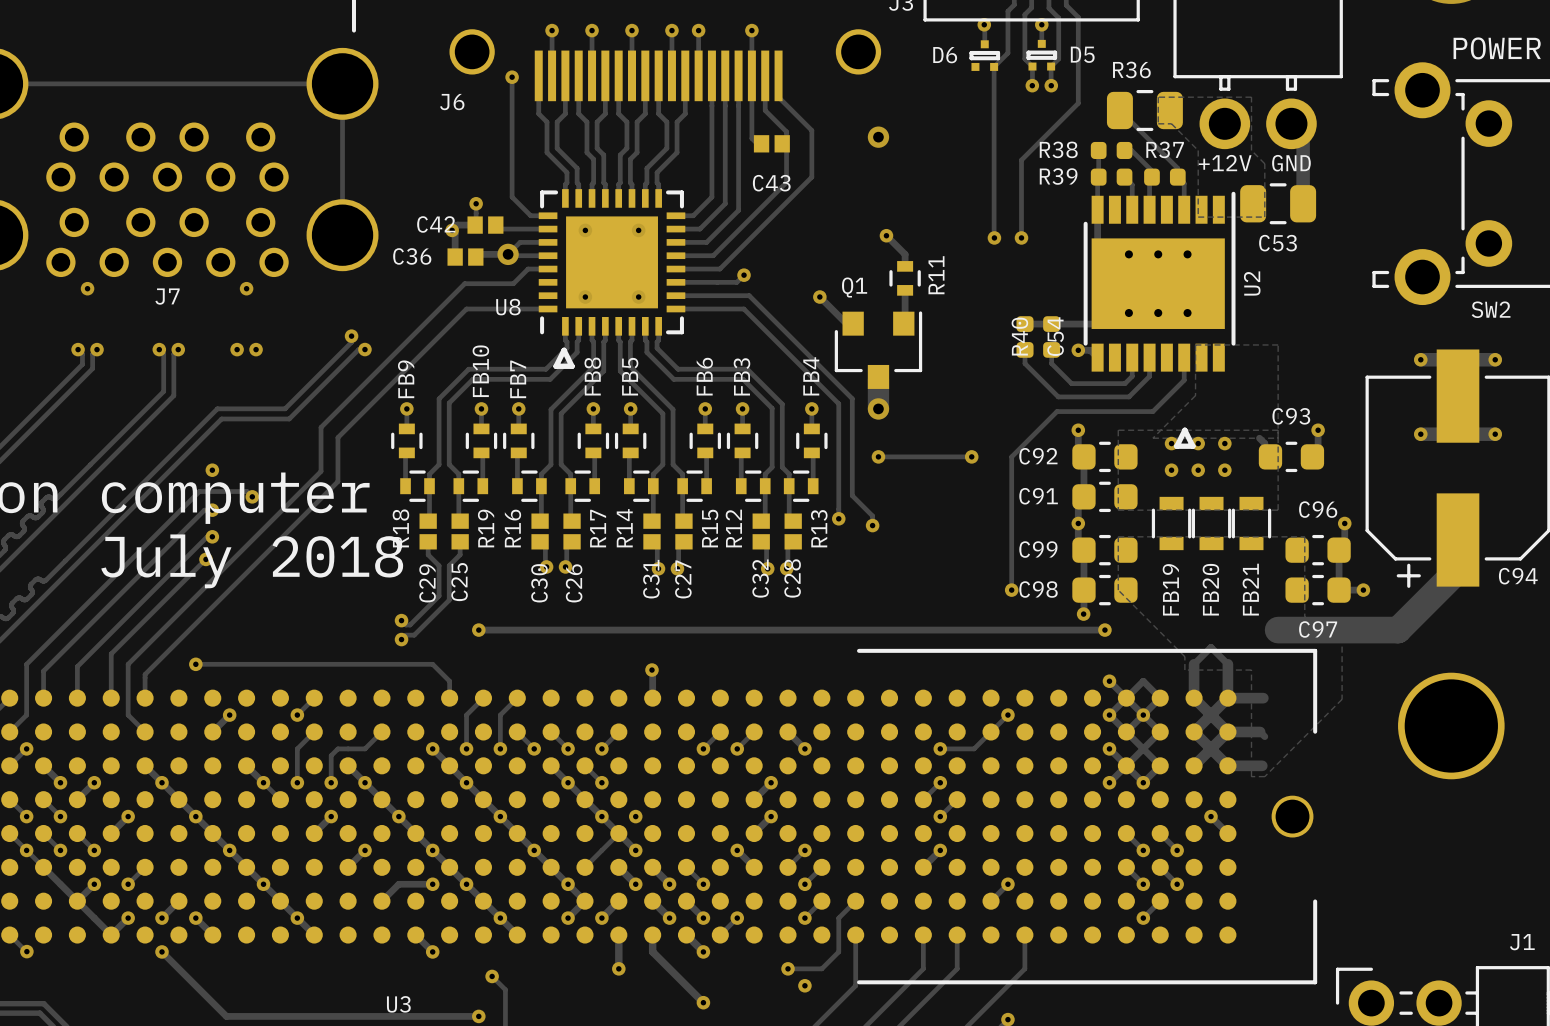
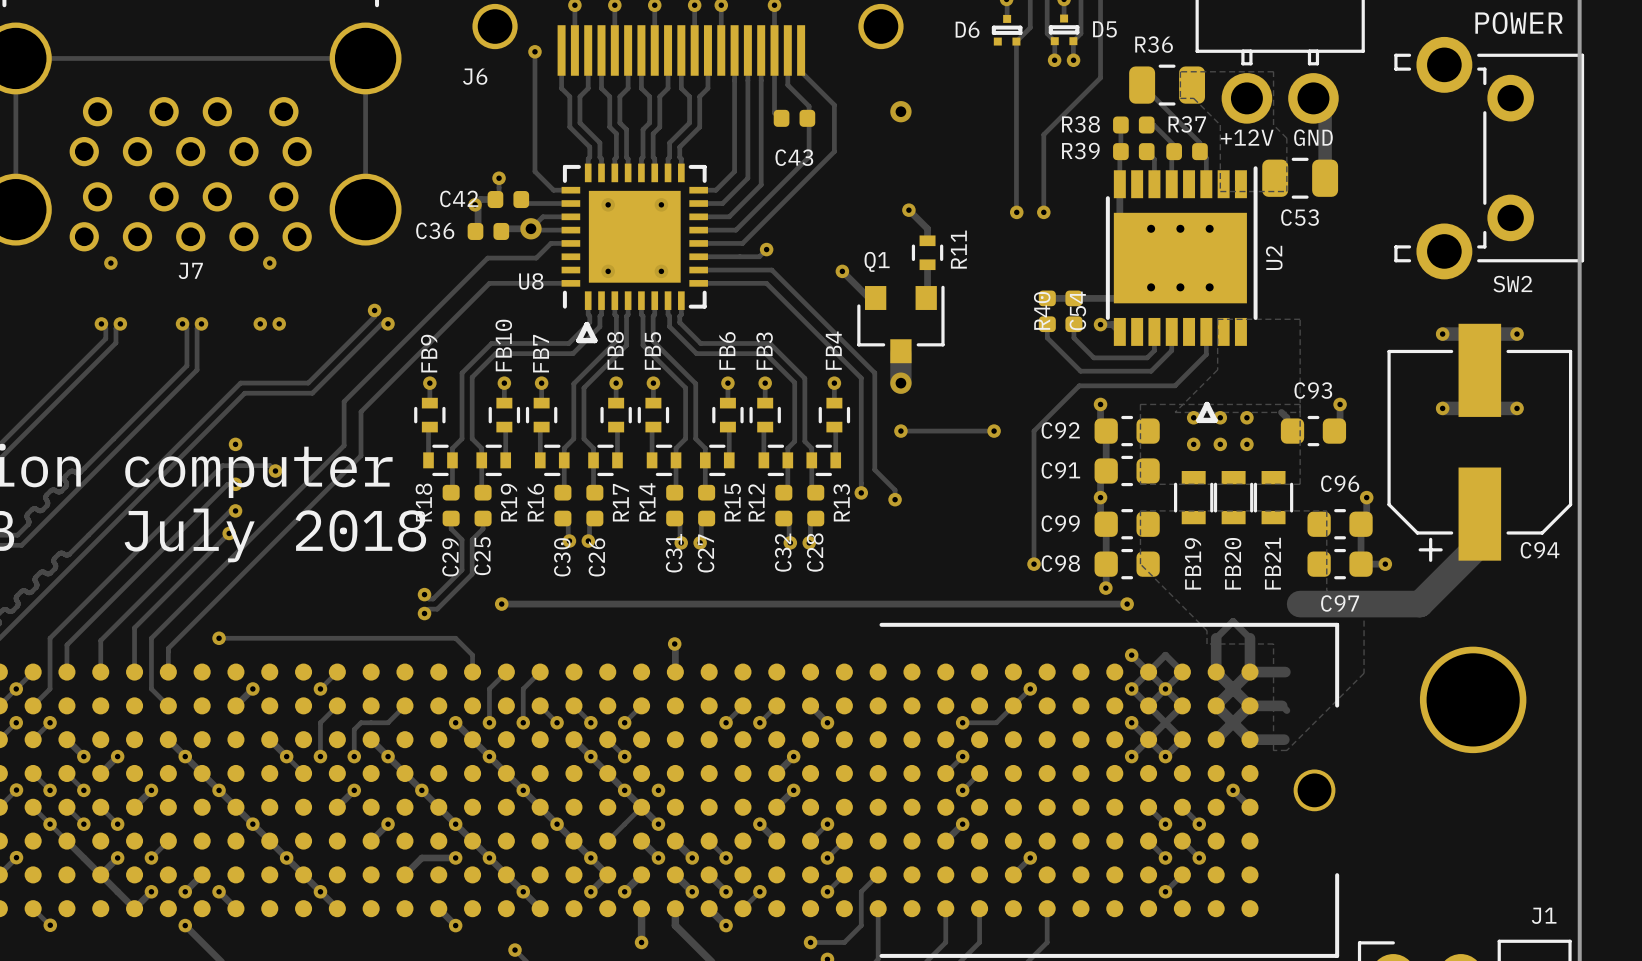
C43 footprint: [753, 135, 790, 153] -> [773, 109, 816, 127]
C42 footprint: [467, 216, 504, 234] -> [487, 191, 530, 209]
C36 footprint: [447, 248, 484, 266] -> [467, 222, 510, 240]
C29 footprint: [419, 513, 437, 550] -> [442, 484, 460, 527]
C25 footprint: [451, 513, 469, 550] -> [474, 484, 492, 527]
C30 footprint: [531, 513, 549, 550] -> [554, 484, 572, 527]
C26 footprint: [563, 513, 581, 550] -> [586, 484, 604, 527]
C31 footprint: [643, 513, 661, 550] -> [666, 484, 684, 527]
C27 footprint: [675, 513, 693, 550] -> [698, 484, 716, 527]
C32 footprint: [752, 513, 770, 550] -> [775, 484, 793, 527]
C28 footprint: [784, 513, 802, 550] -> [807, 484, 825, 527]

